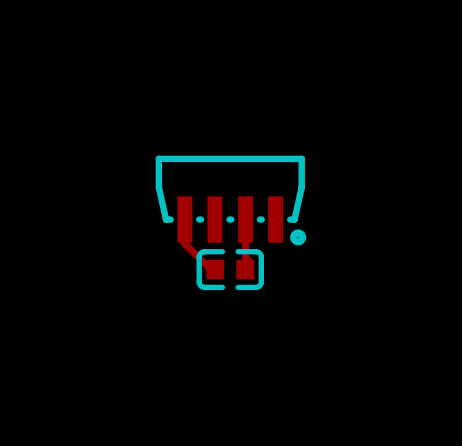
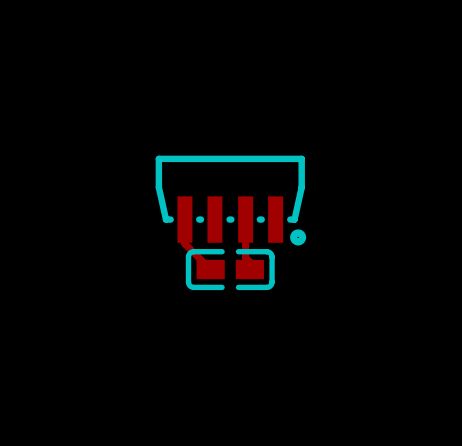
part footprint: [196, 249, 265, 291] -> [185, 249, 275, 291]

